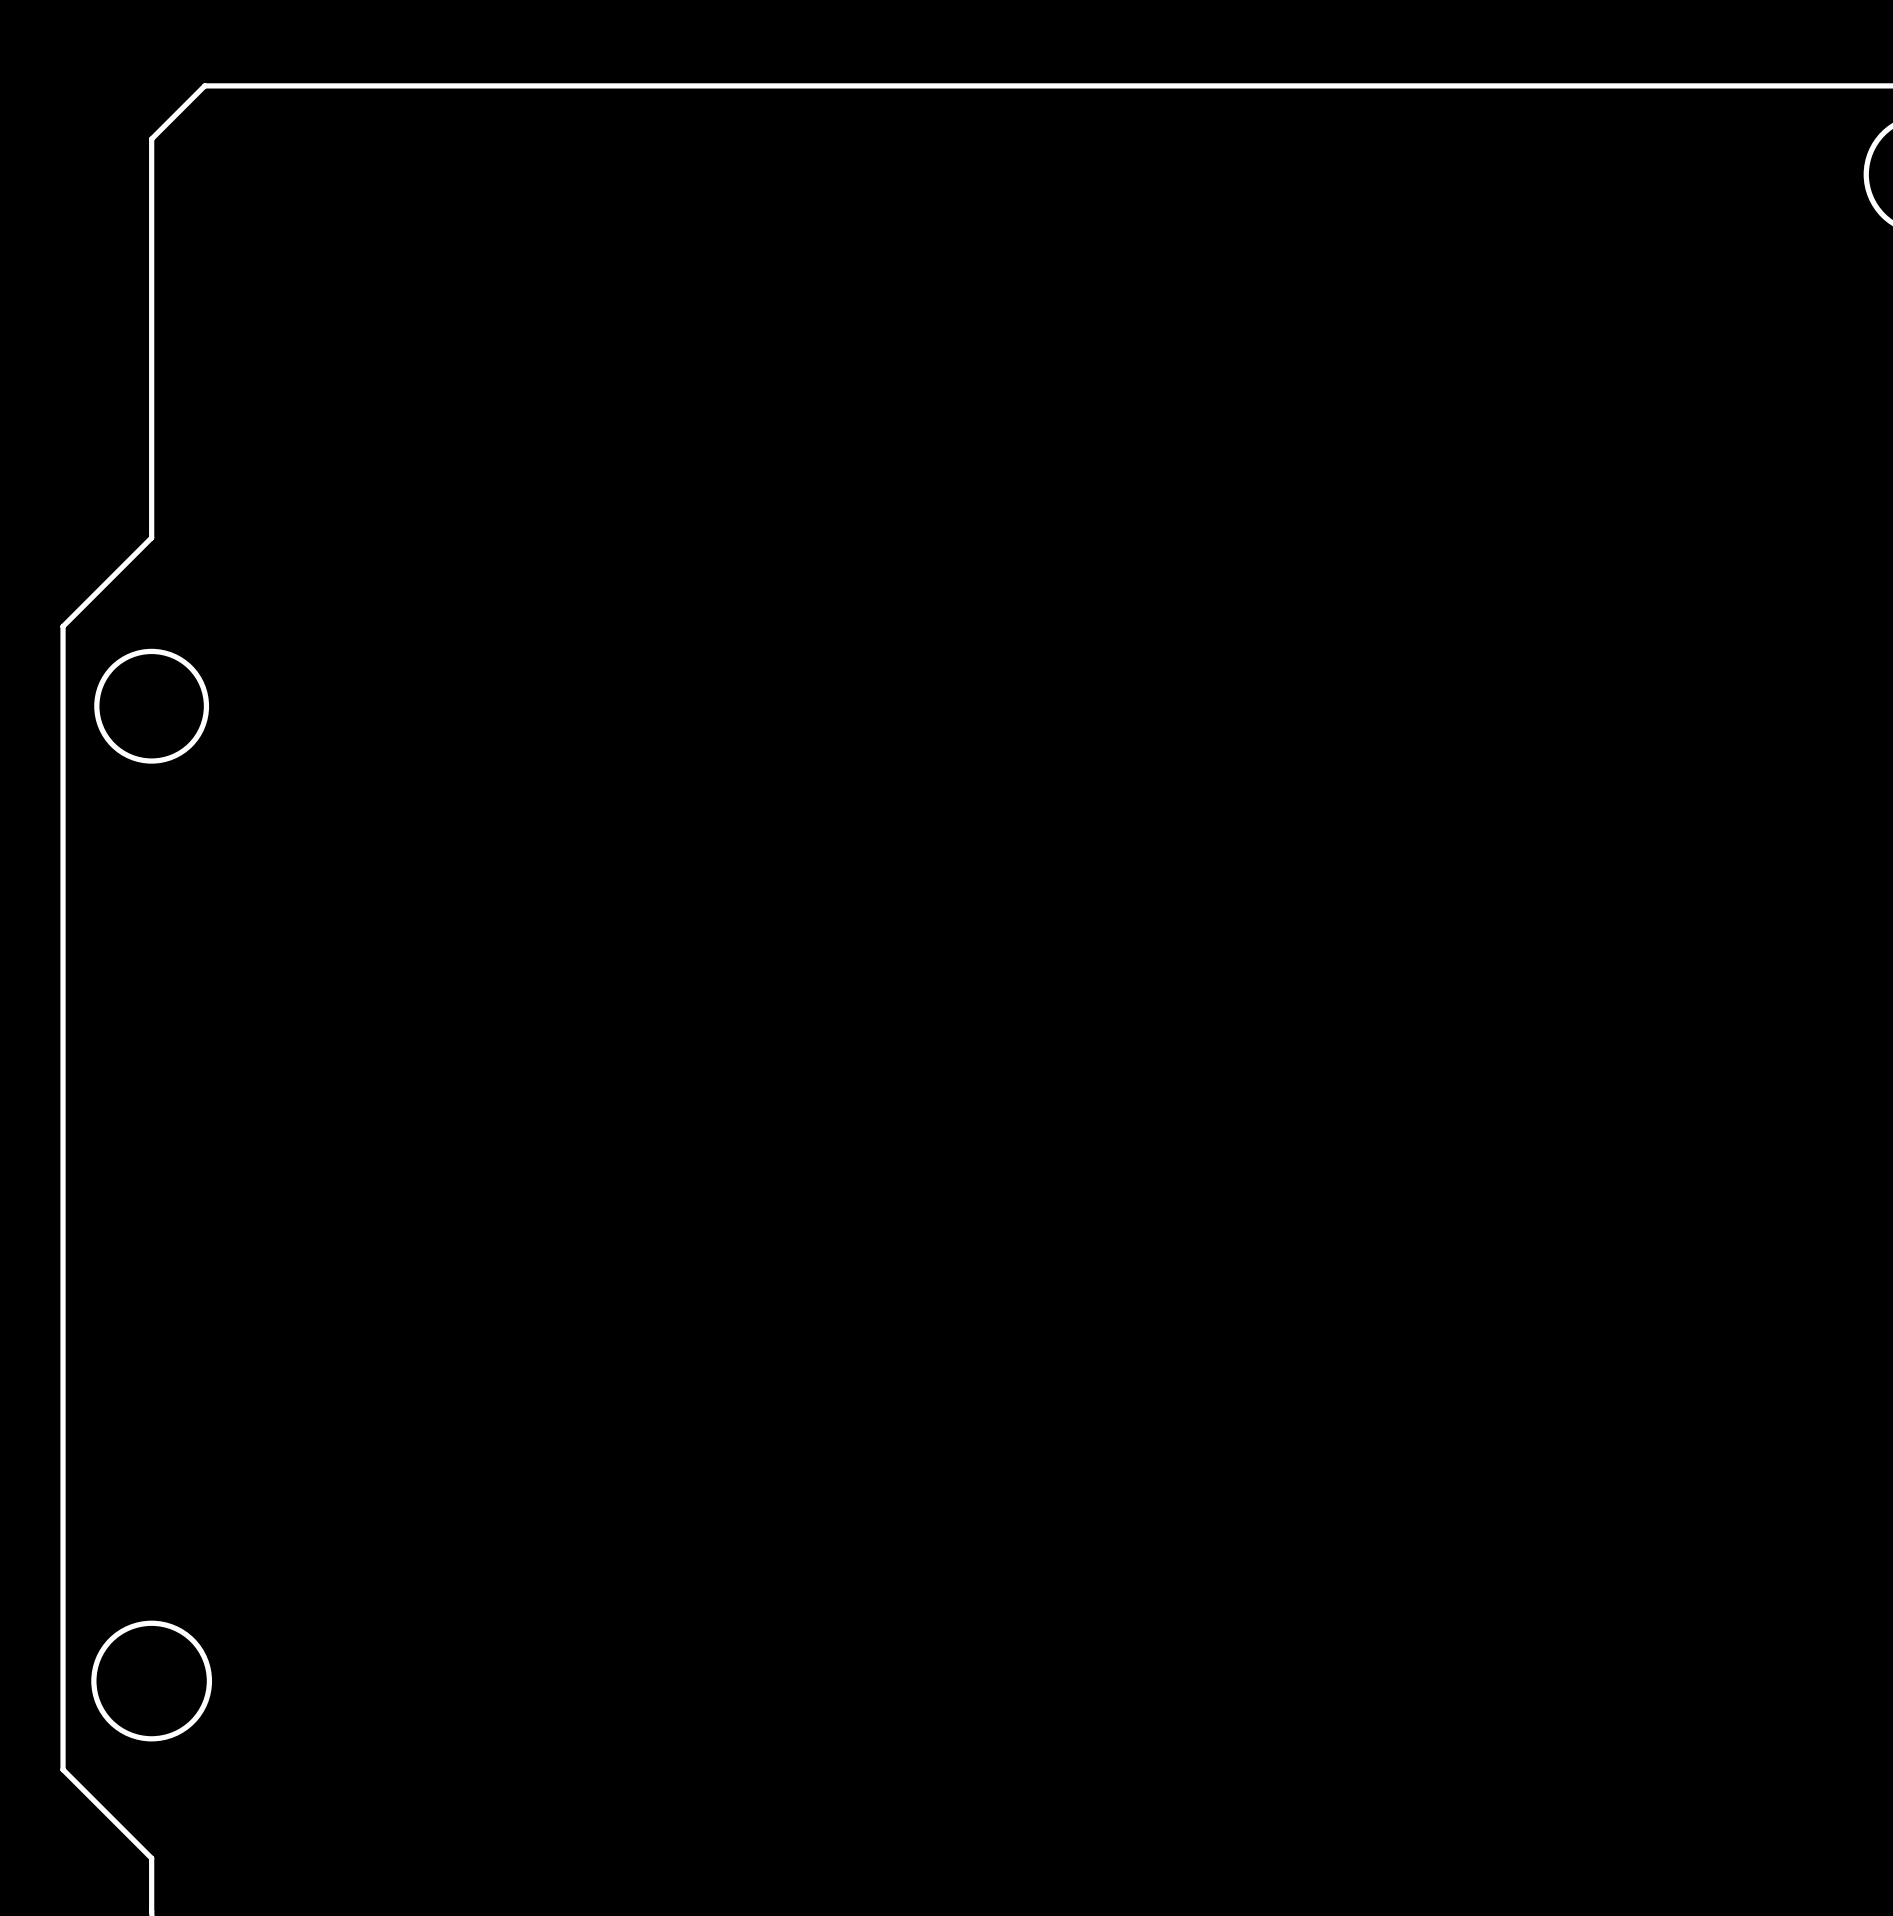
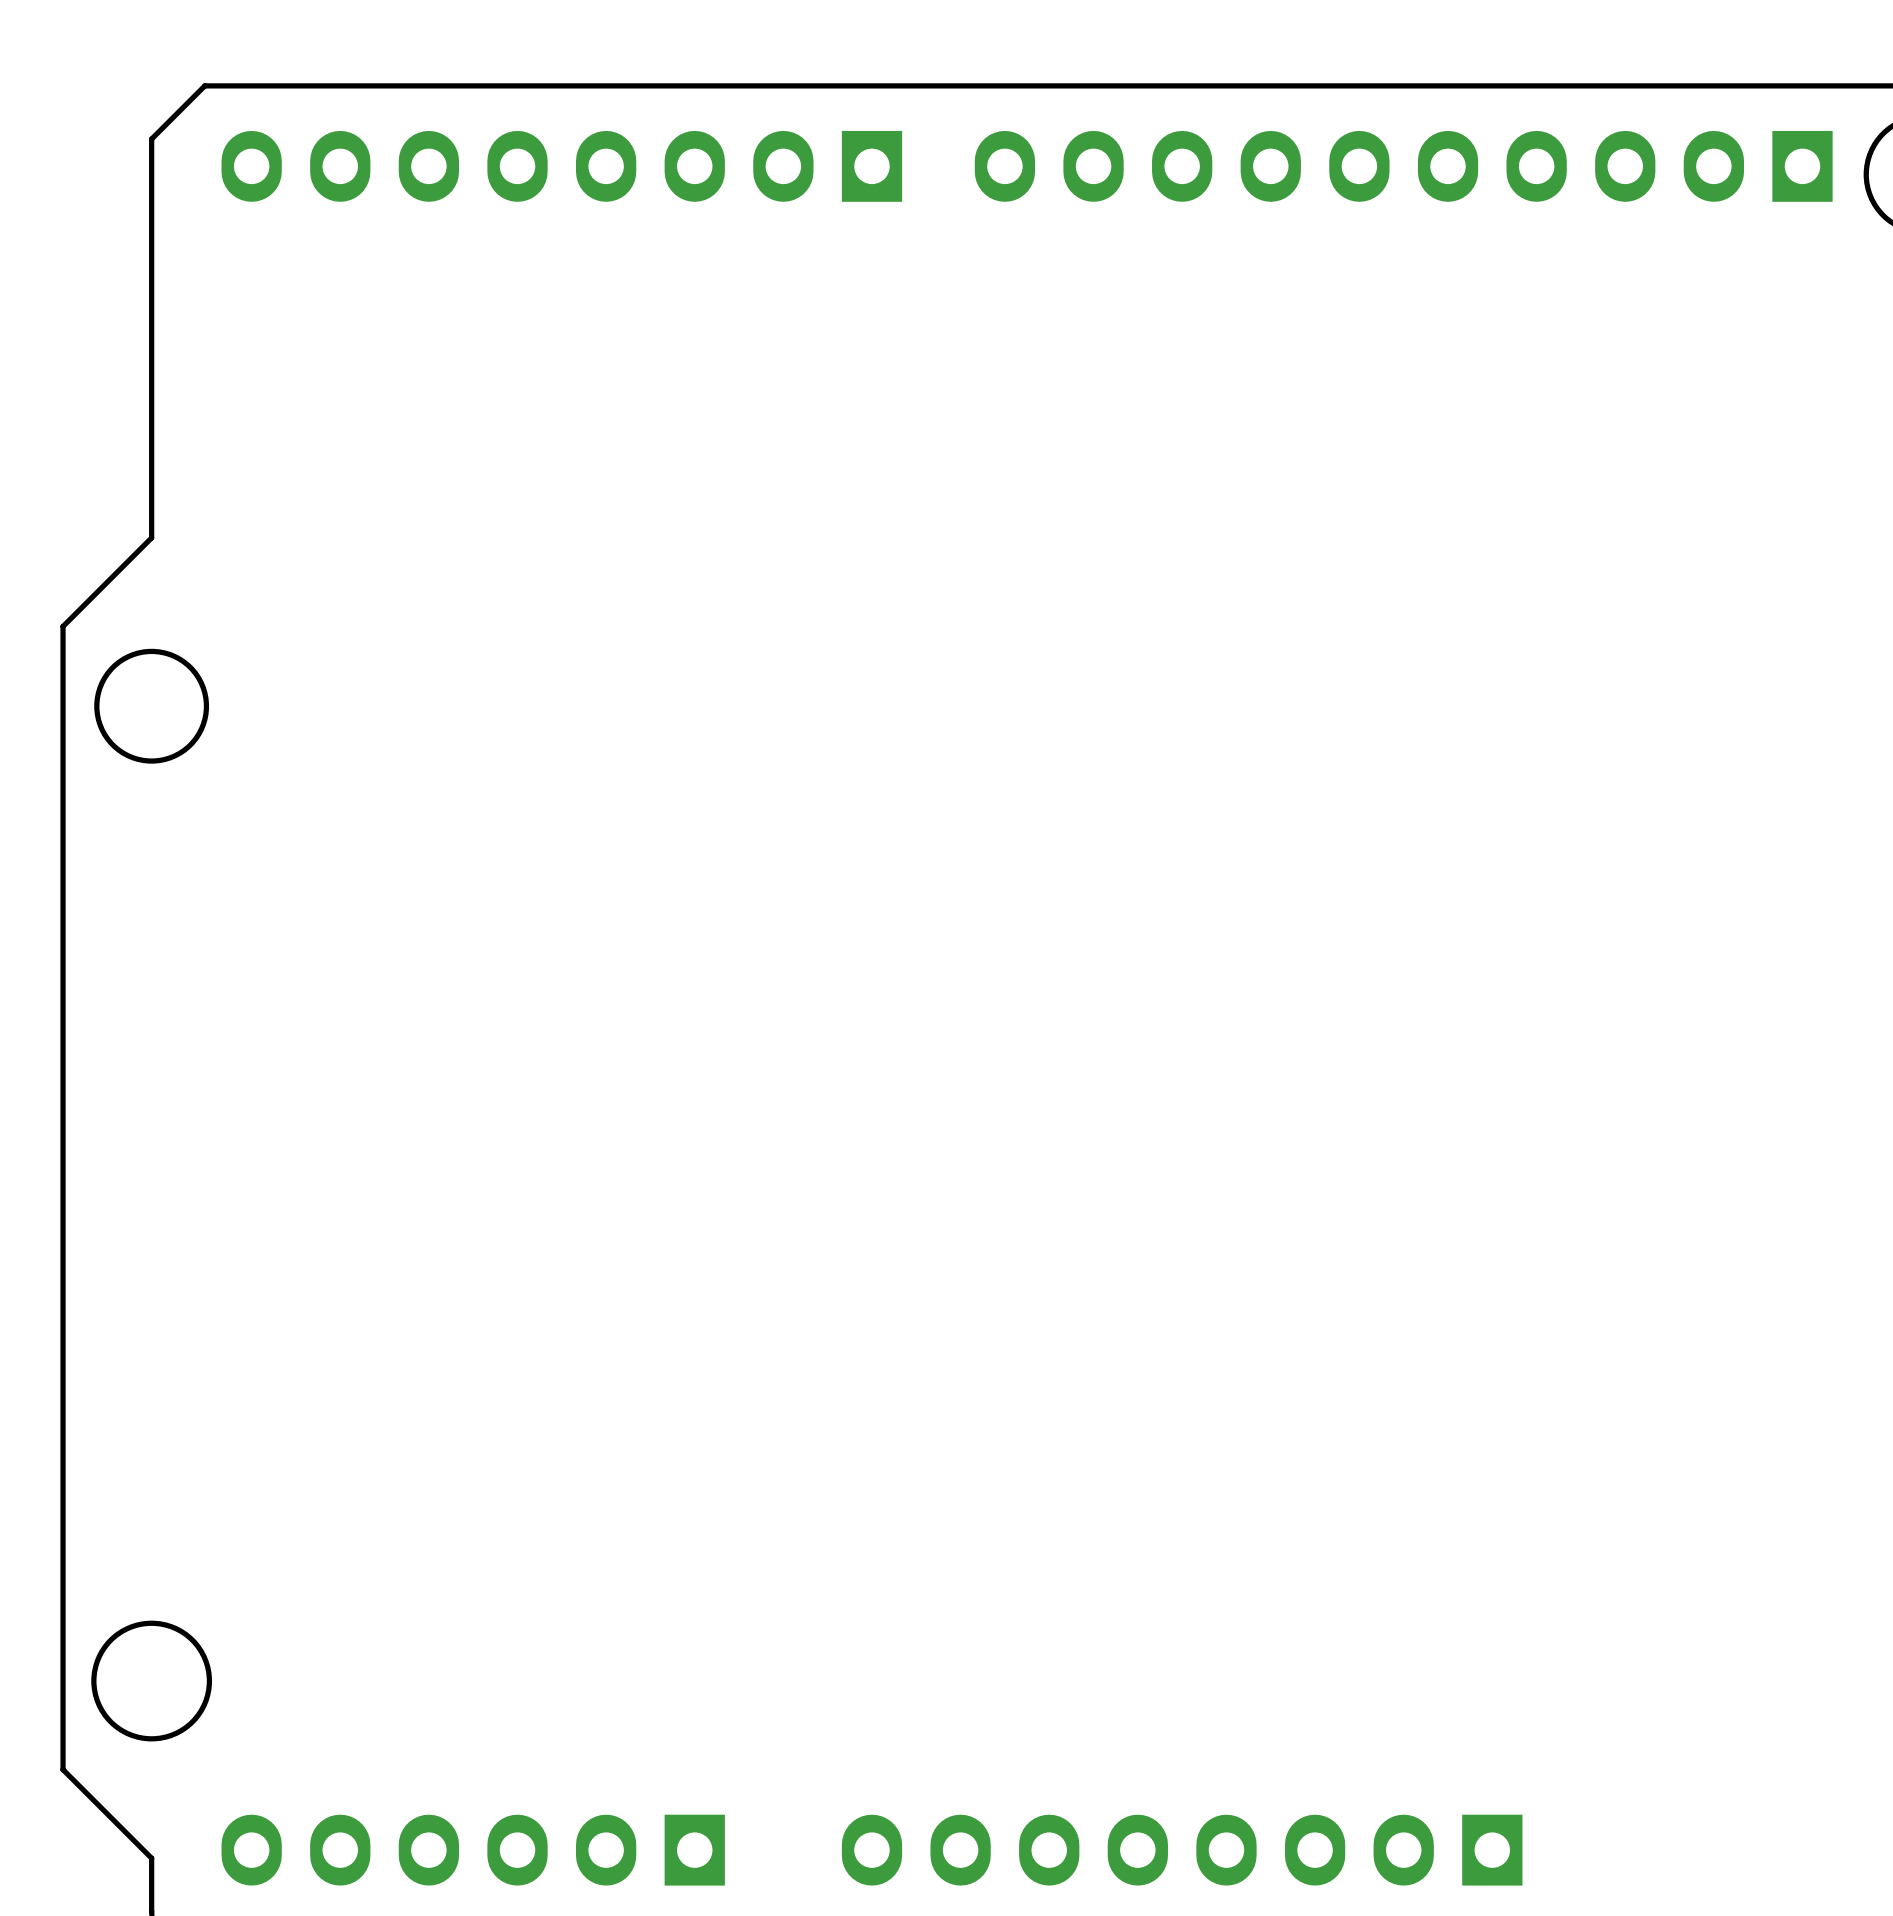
part: none -> (561, 166)
part: none -> (1403, 166)
part: none -> (473, 1850)
part: none -> (1182, 1850)

